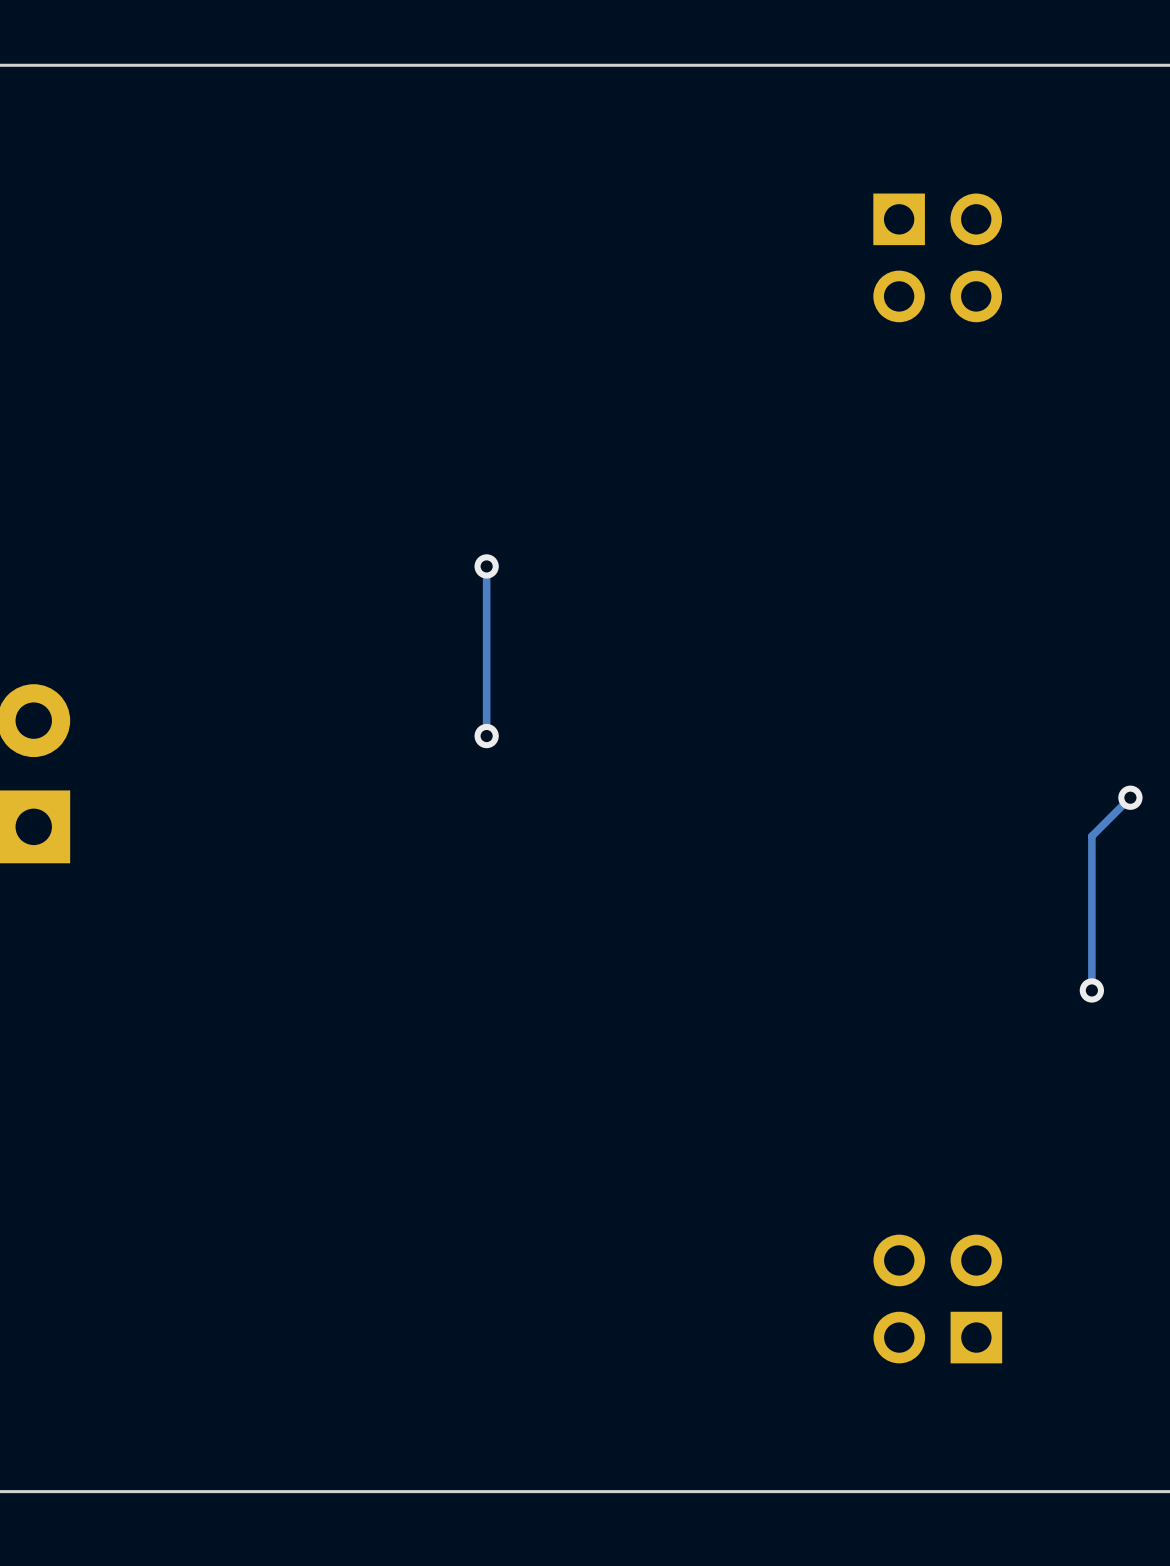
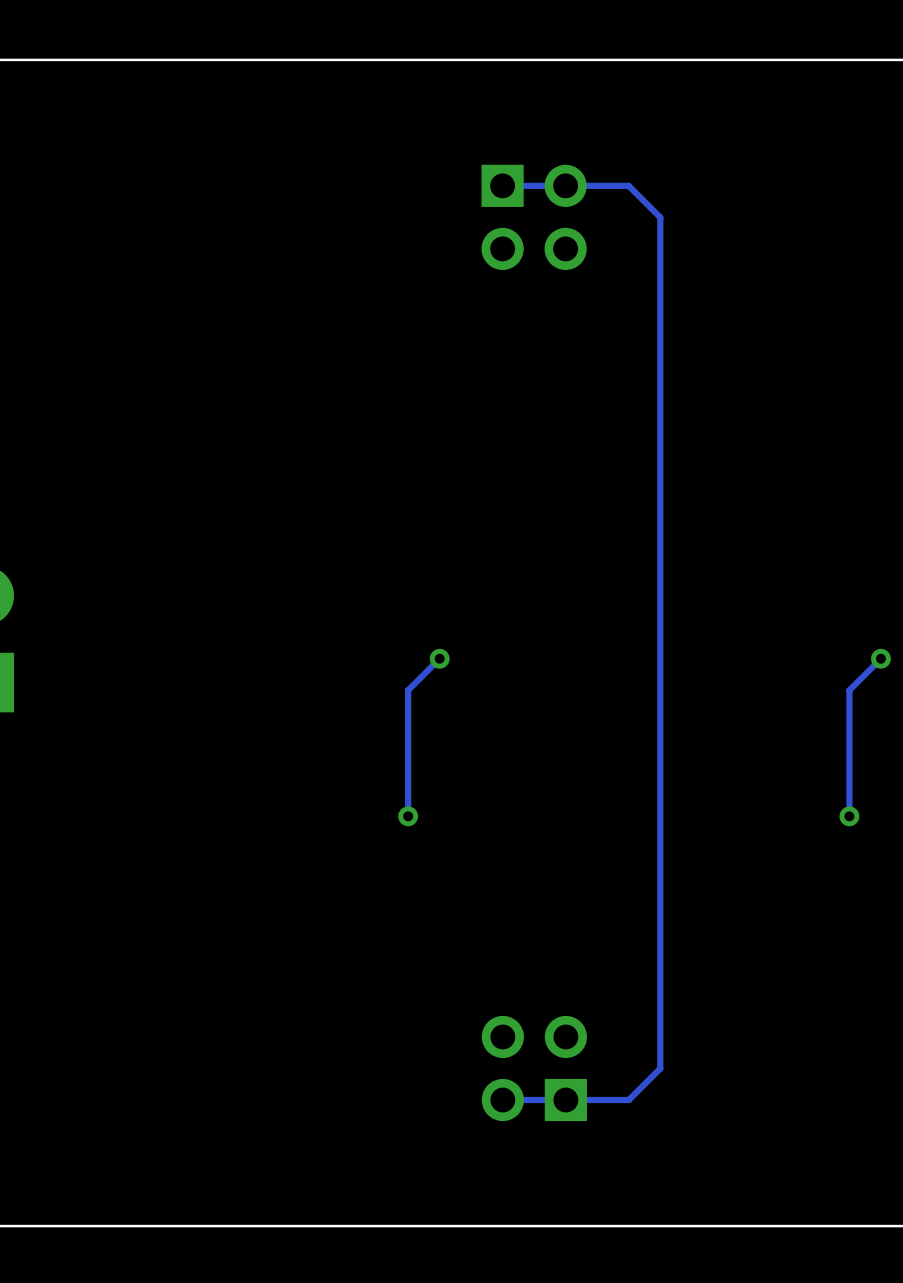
track: none -> (502, 185) (628, 185) (660, 217) (660, 1068) (628, 1100) (502, 1100)
part: none -> (534, 217)
part: (937, 257) -> none
track: (486, 566) (486, 736) -> none
via: (486, 566) -> none
via position: (486, 736) -> (439, 658)
track: none -> (439, 658) (408, 690) (408, 816)
via: none -> (408, 816)
part: none -> (534, 1068)
part: (937, 1299) -> none

